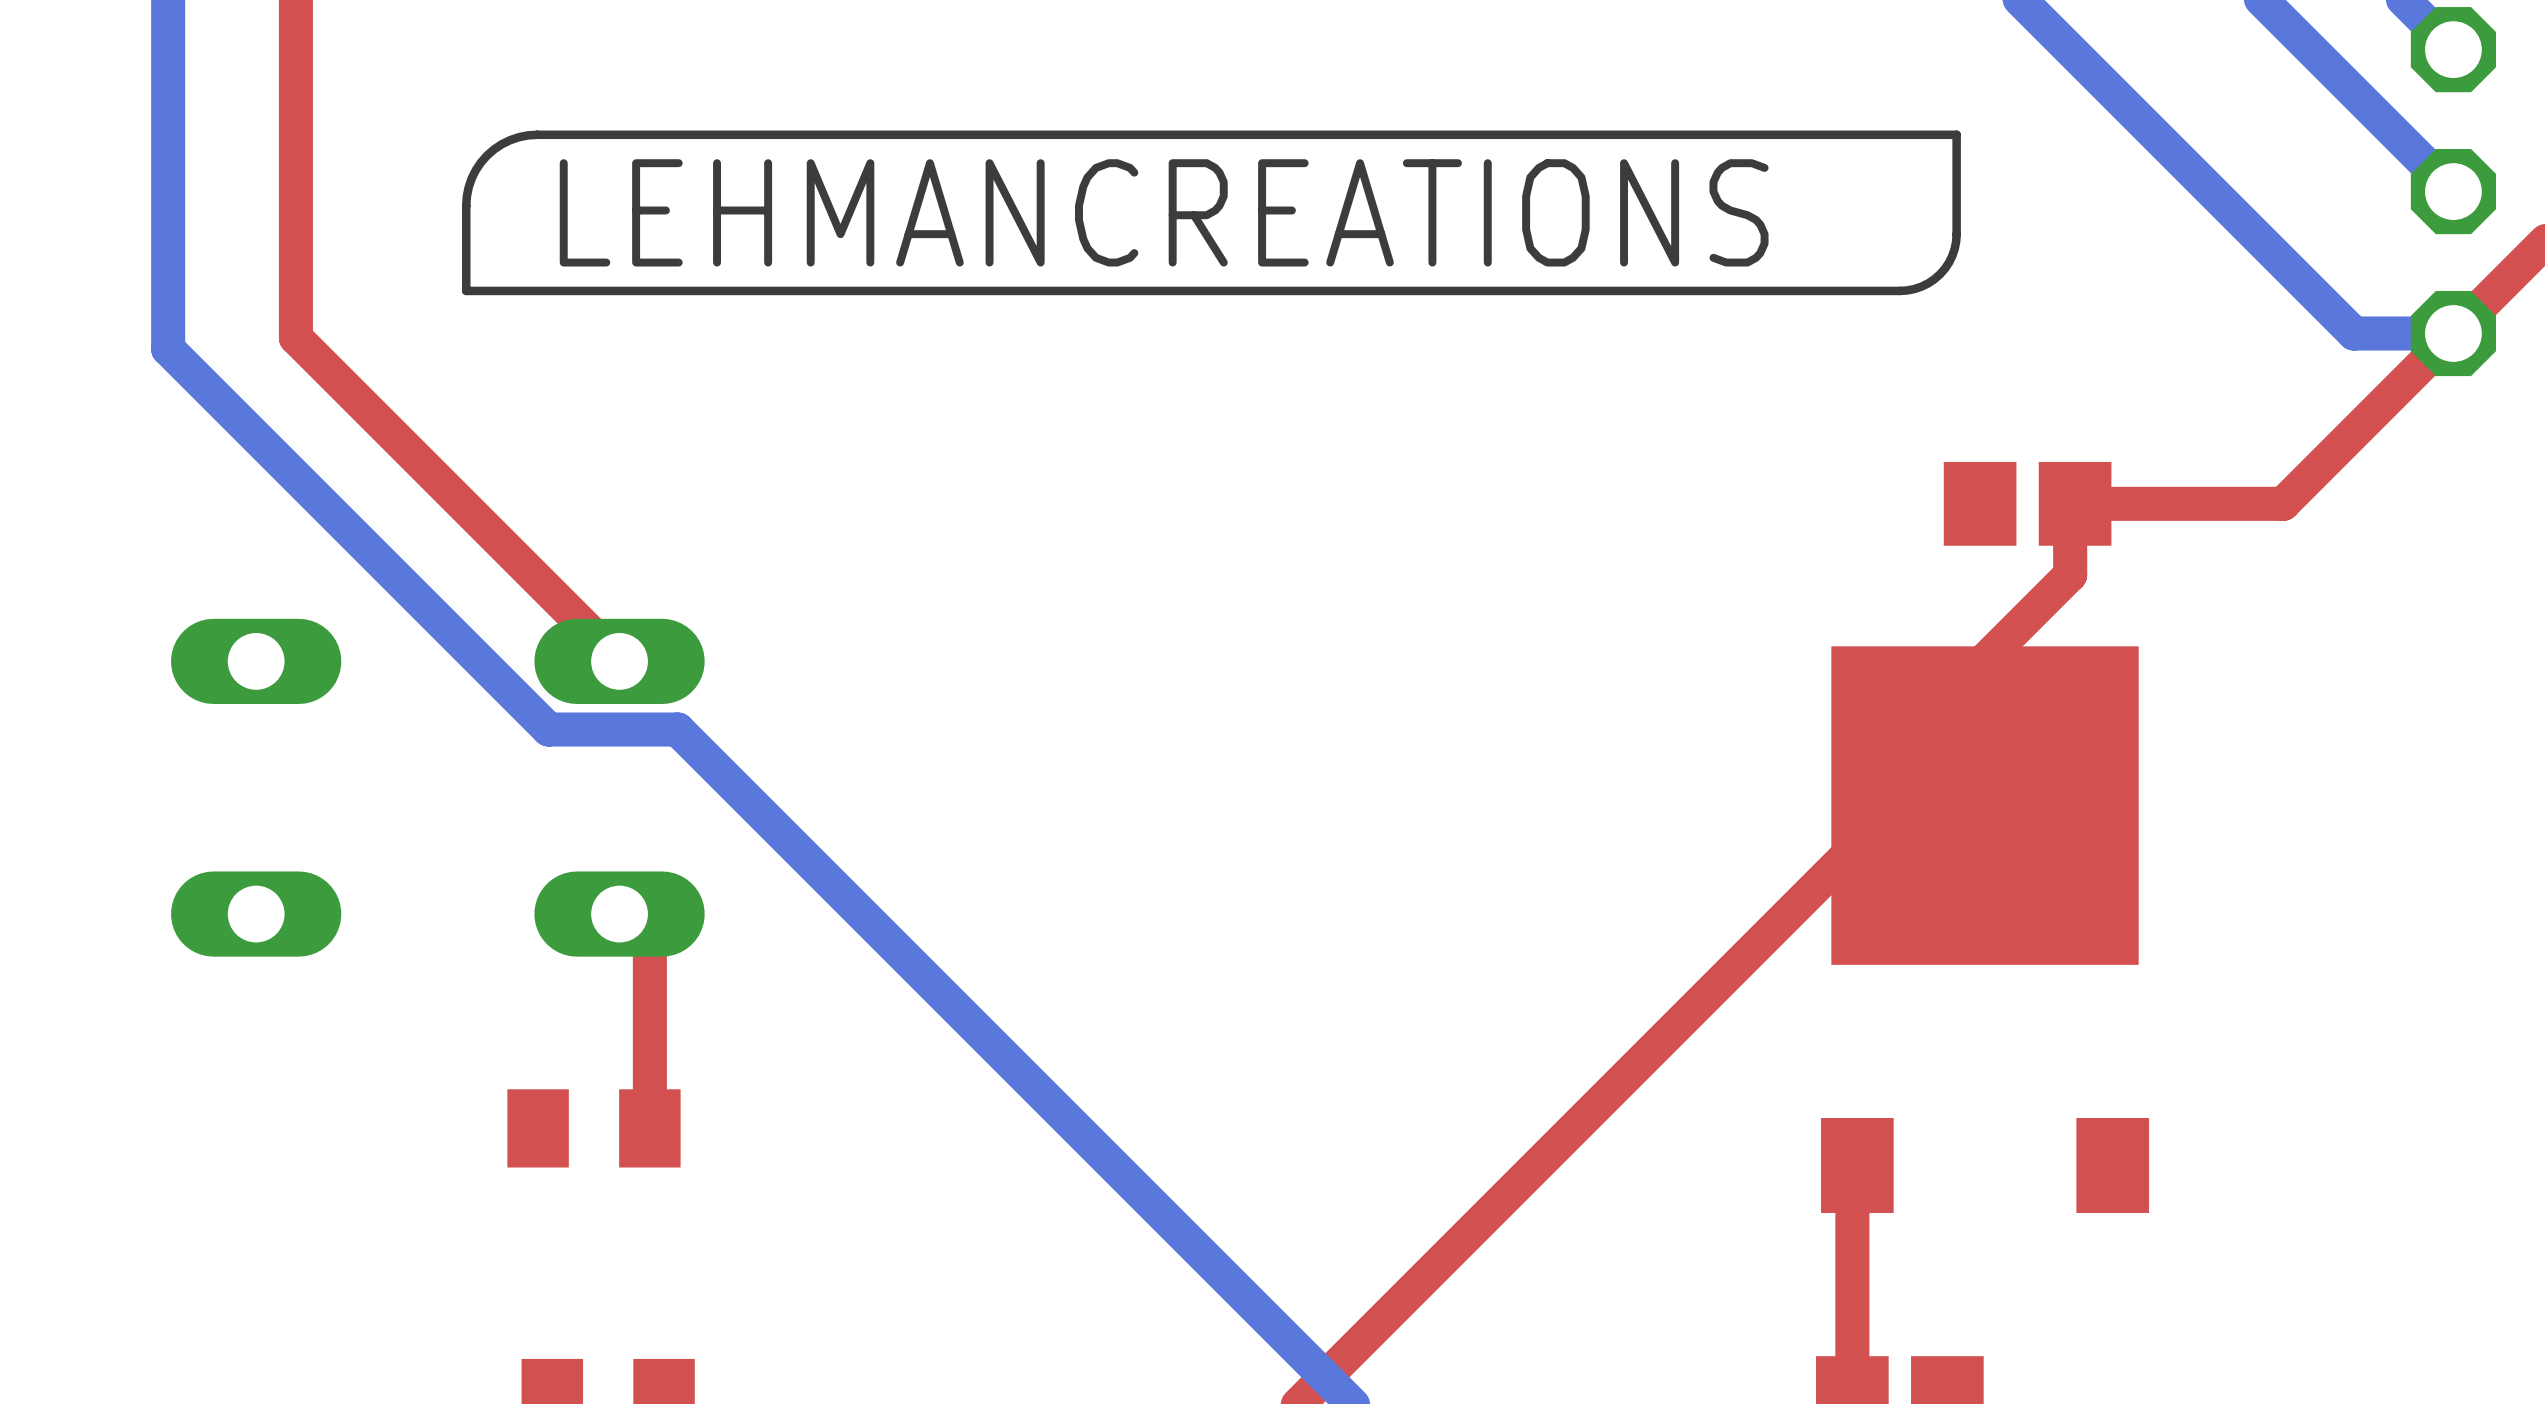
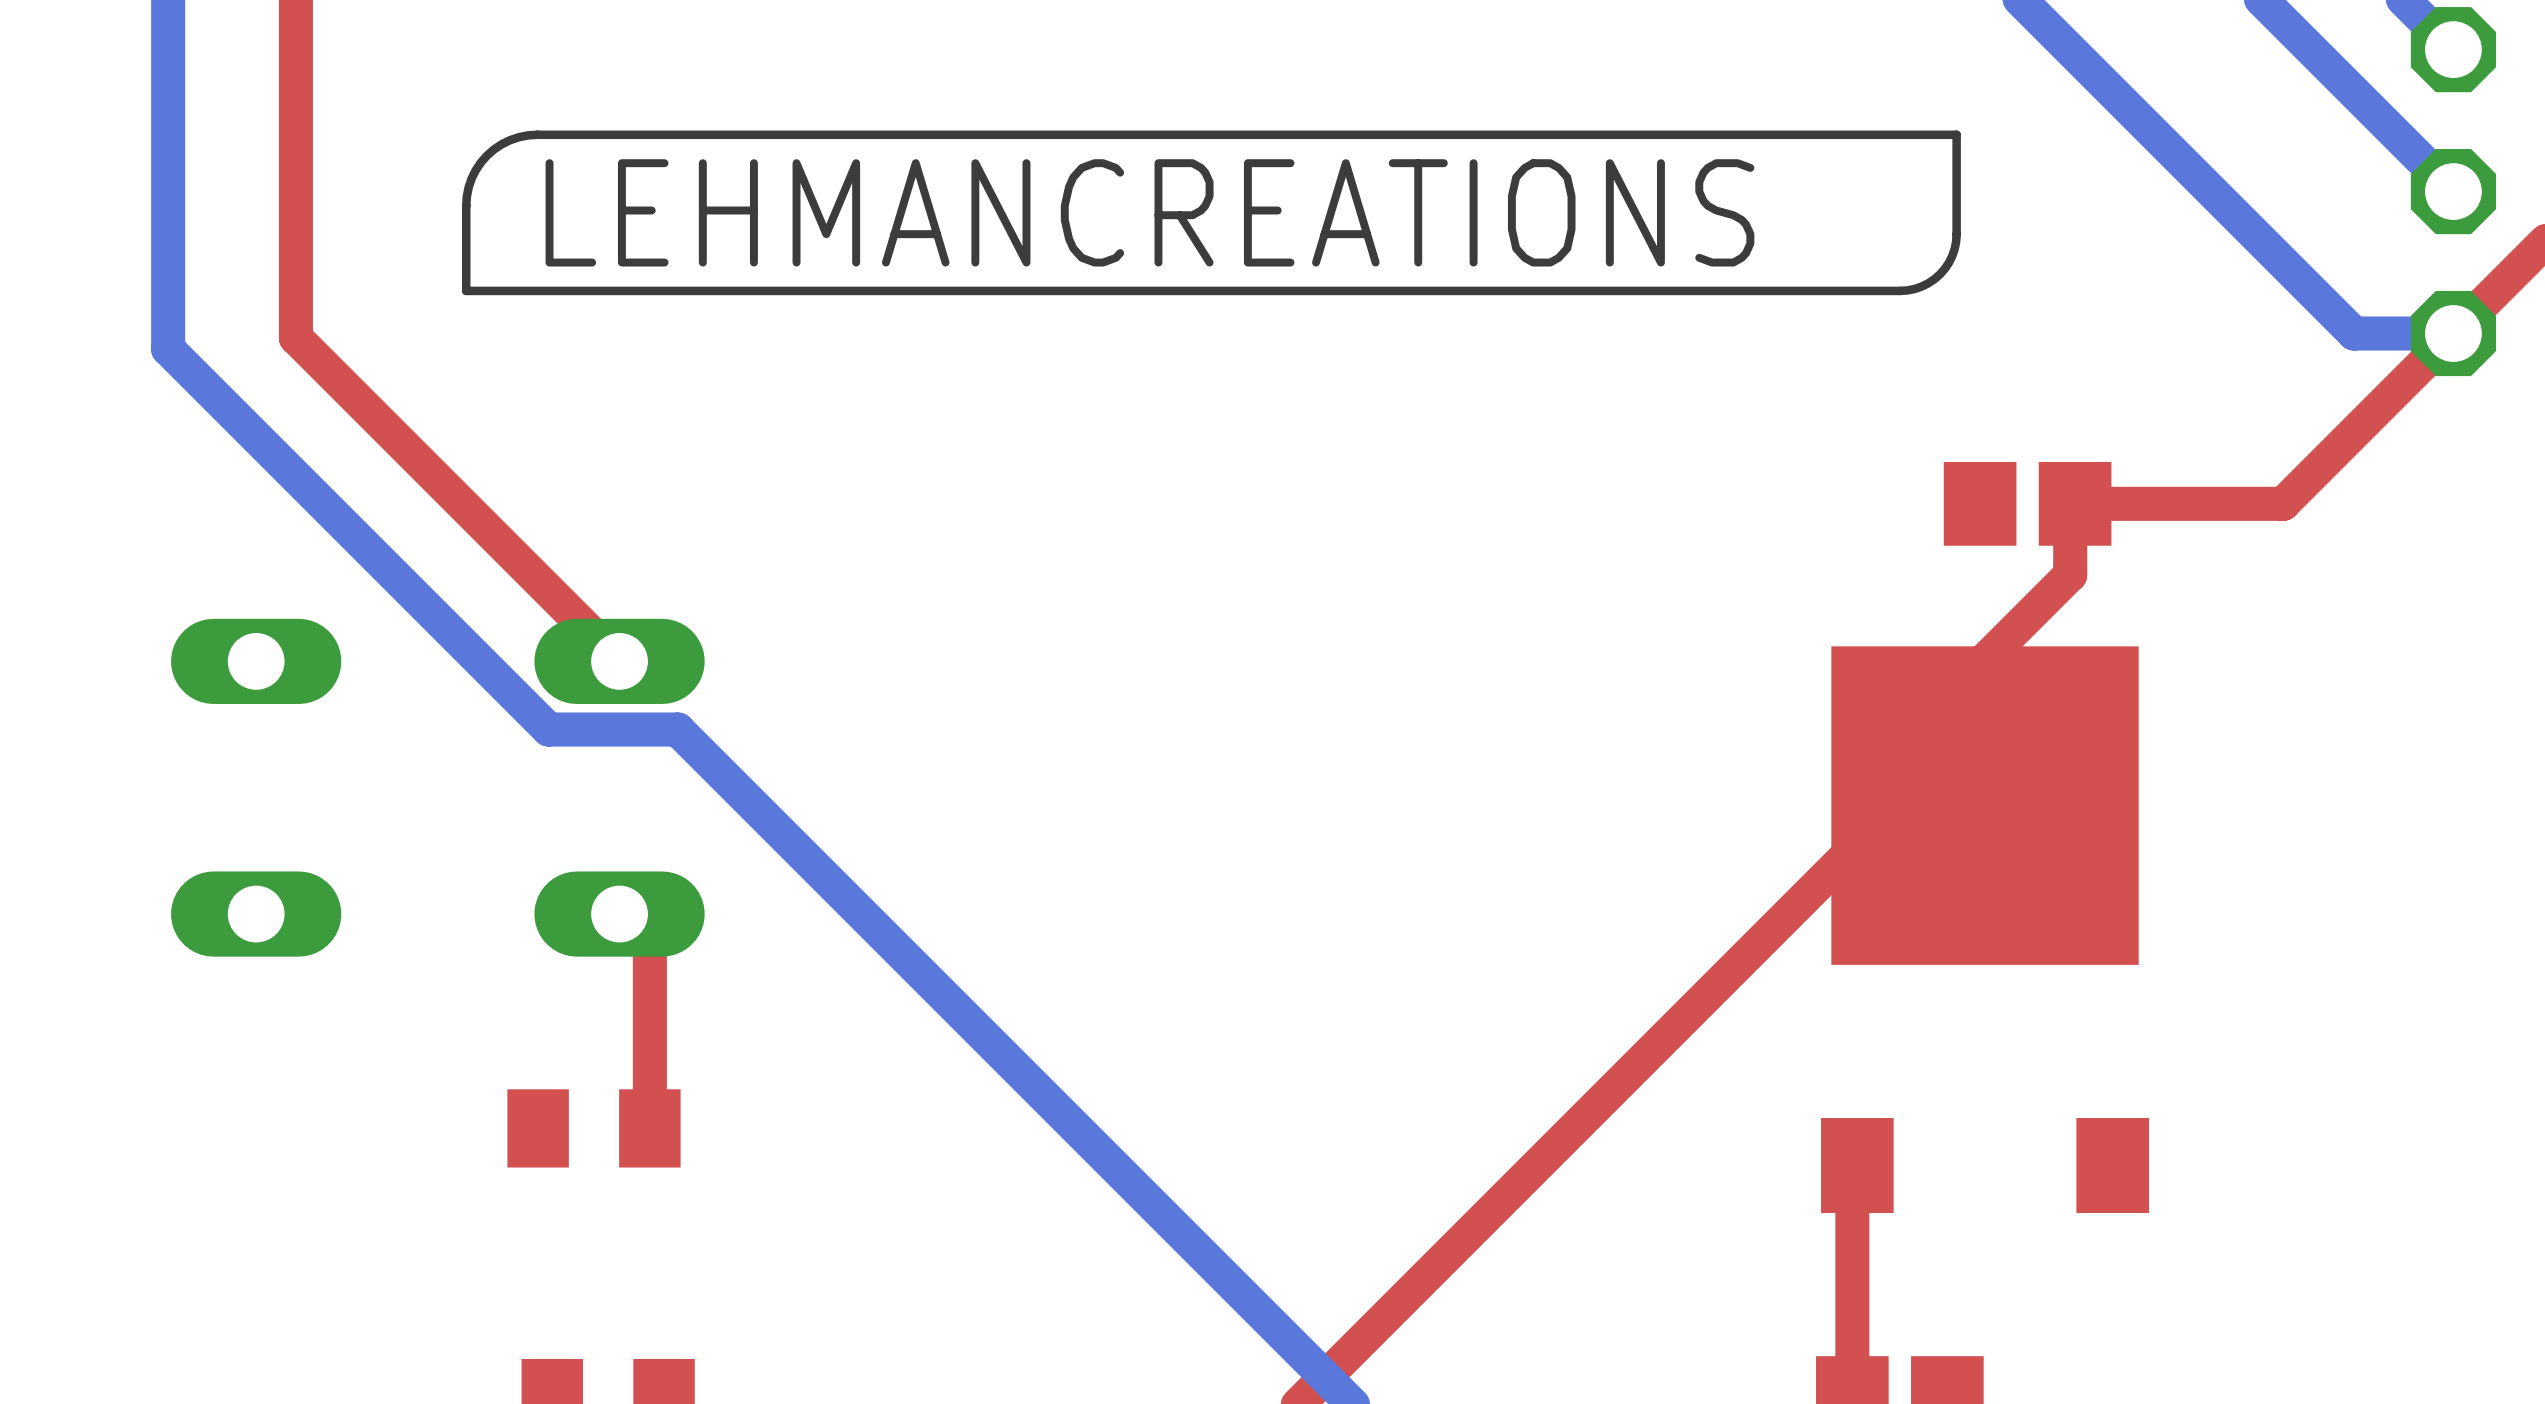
text position: LEHMANCREATIONS (1164, 212) -> LEHMANCREATIONS (1149, 212)

